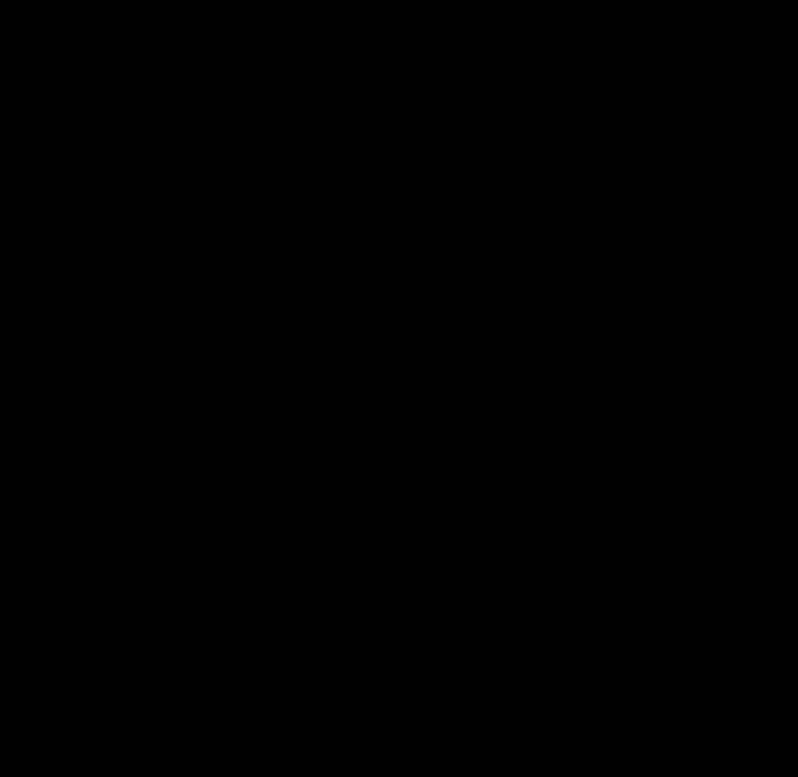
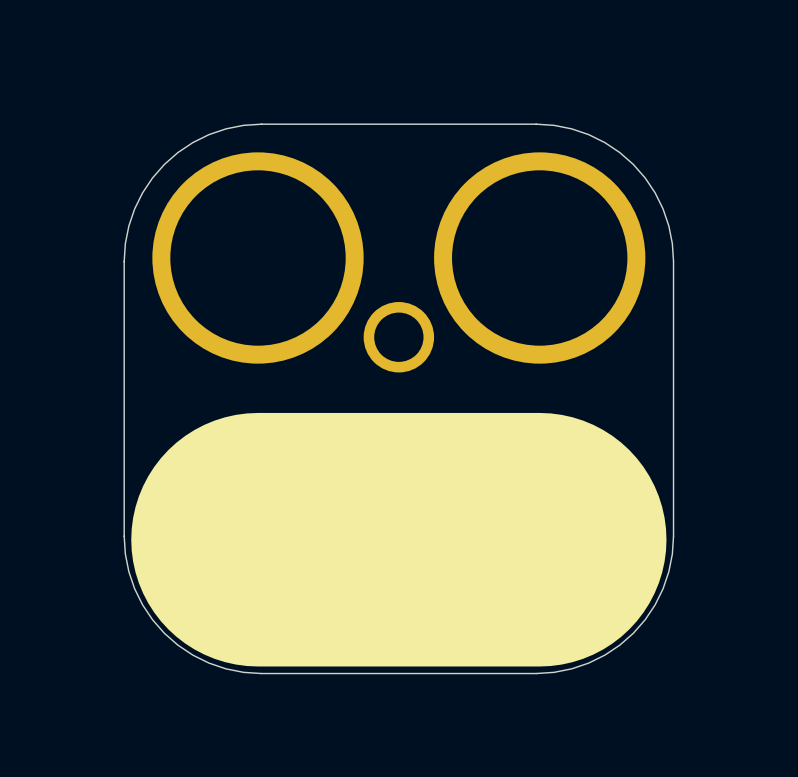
part: none -> (398, 398)

